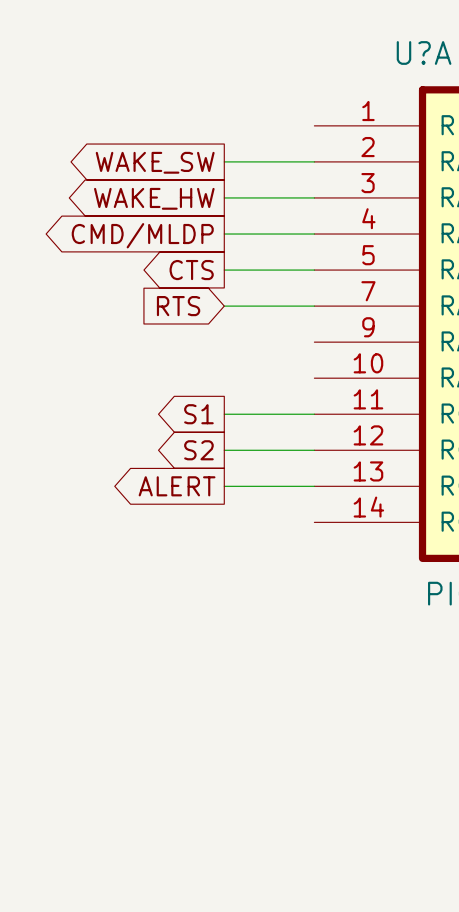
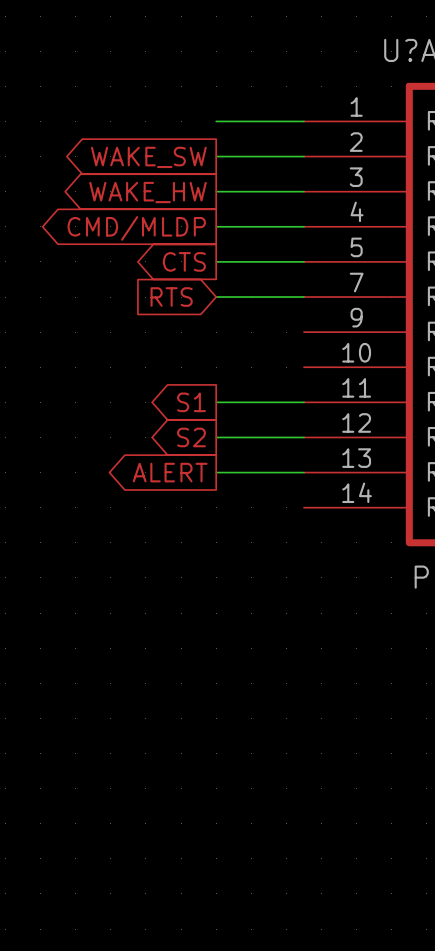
wire: none -> (216, 121) (303, 121)

